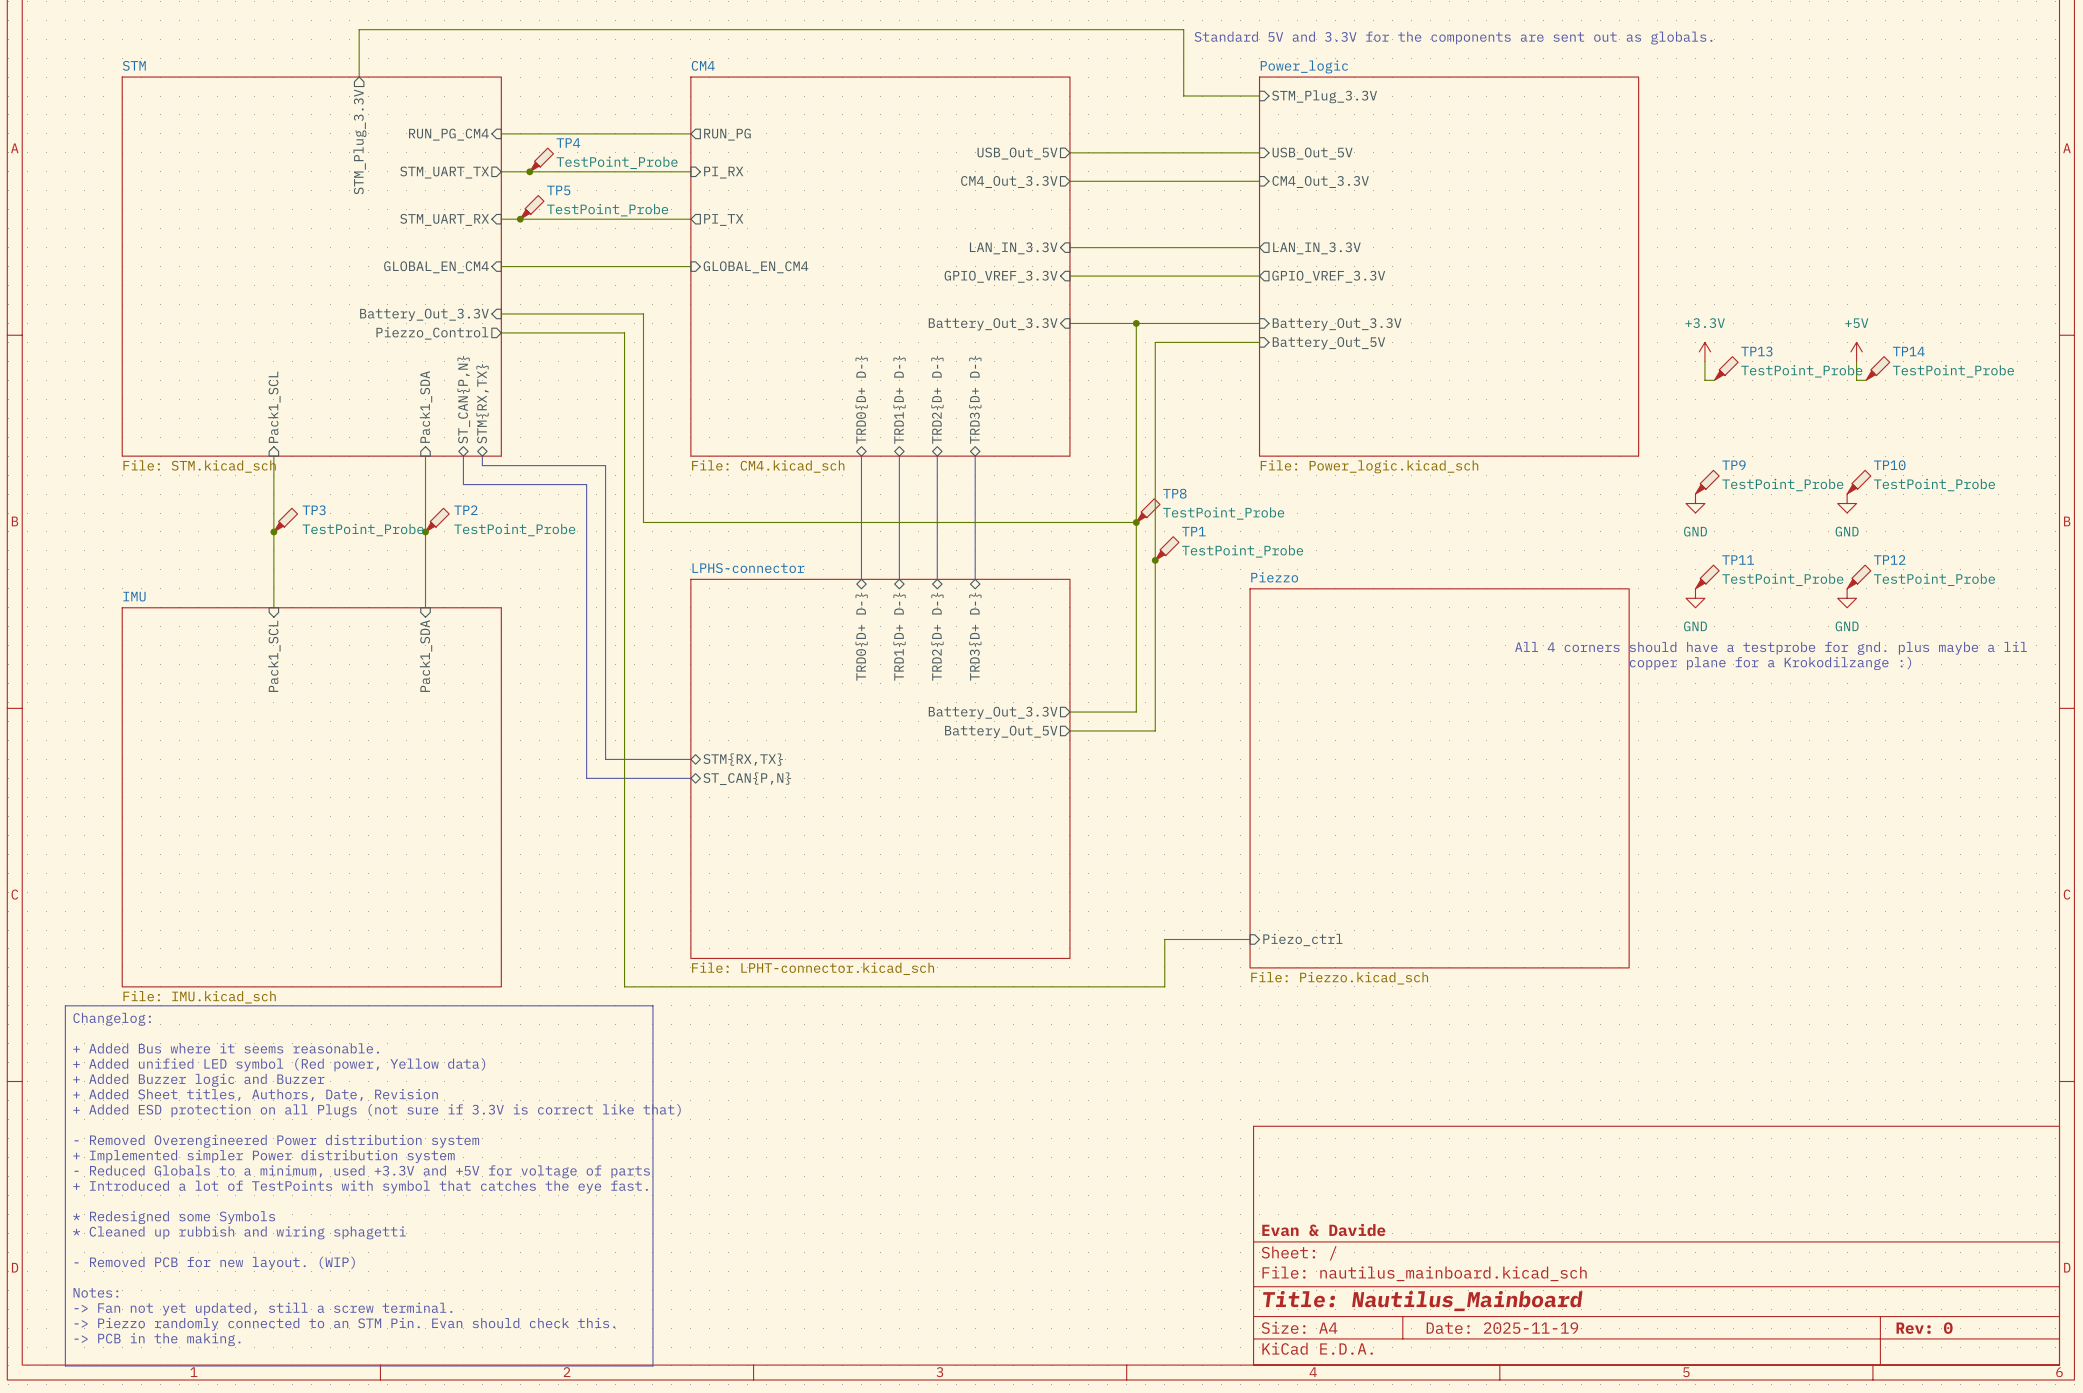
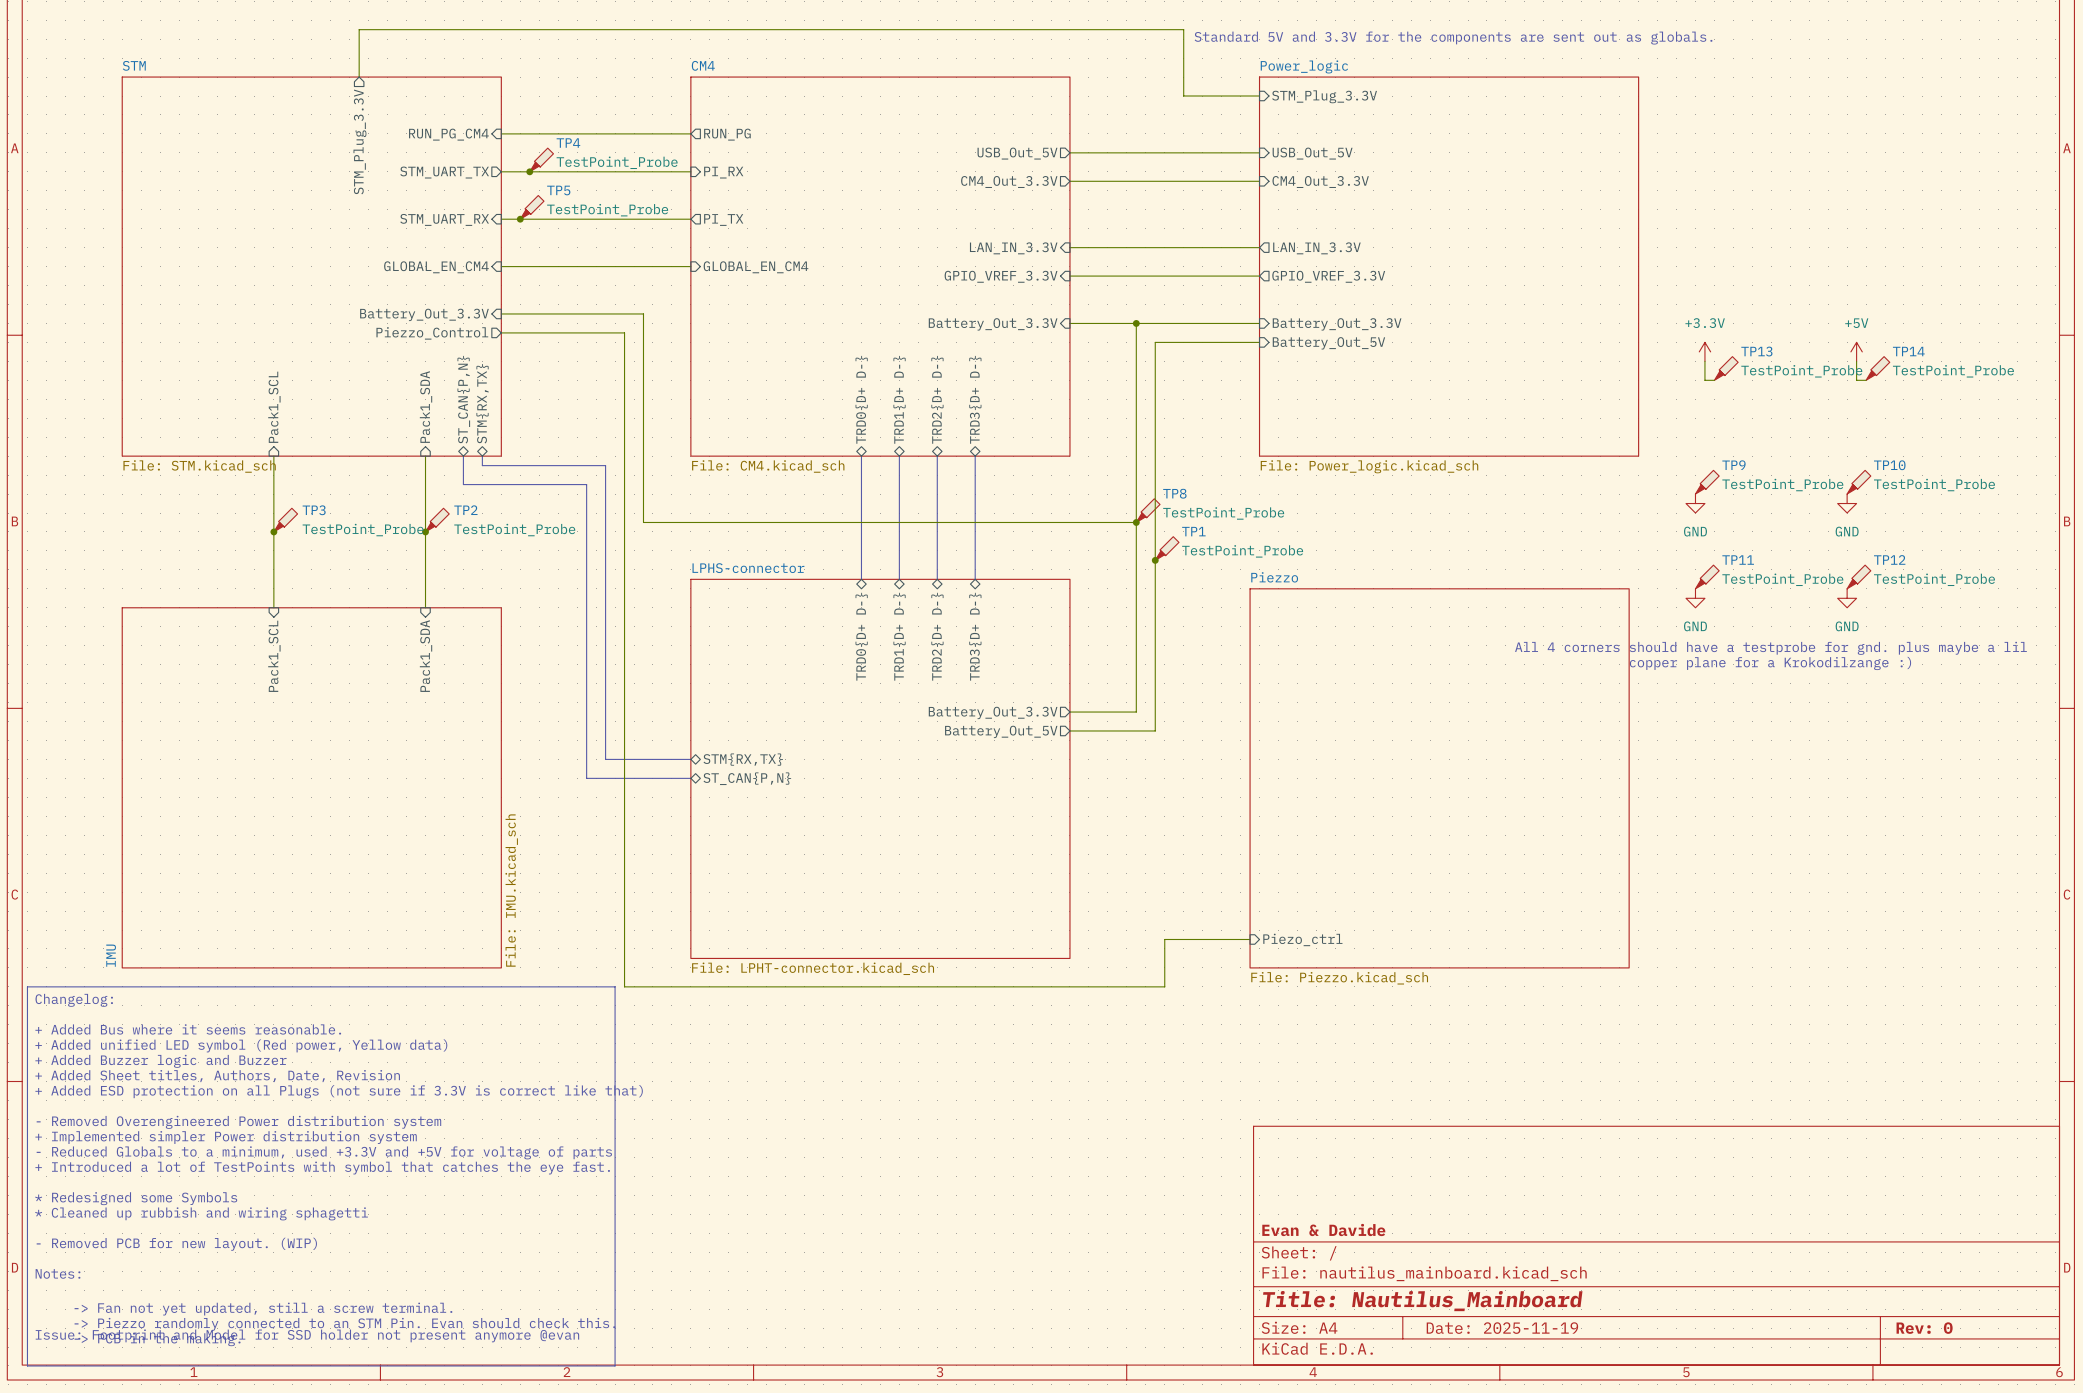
sheet IMU: none -> File: IMU.kicad_sch (311, 787)
sheet IMU: File: IMU.kicad_sch (311, 797) -> none
text position: Changelog: (112, 1019) -> Changelog: (74, 1000)
text position: + Added Bus where it seems reasonable. (226, 1048) -> + Added Bus where it seems reasonable. (188, 1029)
text position: + Added unified LED symbol (Red power, Yellow data) (279, 1064) -> + Added unified LED symbol (Red power, Yellow data) (241, 1045)
text position: + Added Buzzer logic and Buzzer (198, 1080) -> + Added Buzzer logic and Buzzer (160, 1061)
text position: + Added Sheet titles, Authors, Date, Revision (255, 1095) -> + Added Sheet titles, Authors, Date, Revision (217, 1076)
text position: + Added ESD protection on all Plugs (not sure if 3.3V is correct like that) (377, 1110) -> + Added ESD protection on all Plugs (not sure if 3.3V is correct like that) (339, 1091)
text position: - Removed Overengineered Power distribution system (276, 1141) -> - Removed Overengineered Power distribution system (238, 1122)
text position: + Implemented simpler Power distribution system (263, 1156) -> + Implemented simpler Power distribution system (226, 1137)
text position: - Reduced Globals to a minimum, used +3.3V and +5V for voltage of parts (362, 1171) -> - Reduced Globals to a minimum, used +3.3V and +5V for voltage of parts (324, 1152)
text position: + Introduced a lot of TestPoints with symbol that catches the eye fast. (360, 1186) -> + Introduced a lot of TestPoints with symbol that catches the eye fast. (322, 1168)
text position: * Redesigned some Symbols (174, 1217) -> * Redesigned some Symbols (136, 1198)
text position: * Cleaned up rubbish and wiring sphagetti (239, 1232) -> * Cleaned up rubbish and wiring sphagetti (201, 1213)
text position: - Removed PCB for new layout. (WIP) (214, 1263) -> - Removed PCB for new layout. (WIP) (176, 1244)
text position: Notes: (95, 1292) -> Notes: (58, 1273)
text: none -> Issue: Footprint and Model for SSD holder not present anymore @evan (307, 1335)
line: (65, 1365) (65, 1005) (652, 1005) (652, 1365) (615, 1365) -> (65, 1365) (27, 1365) (27, 986) (615, 986) (615, 1365)

